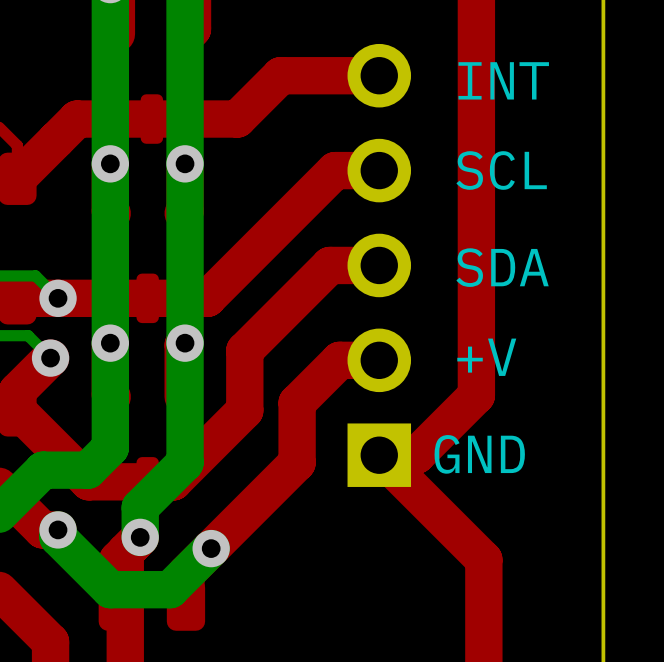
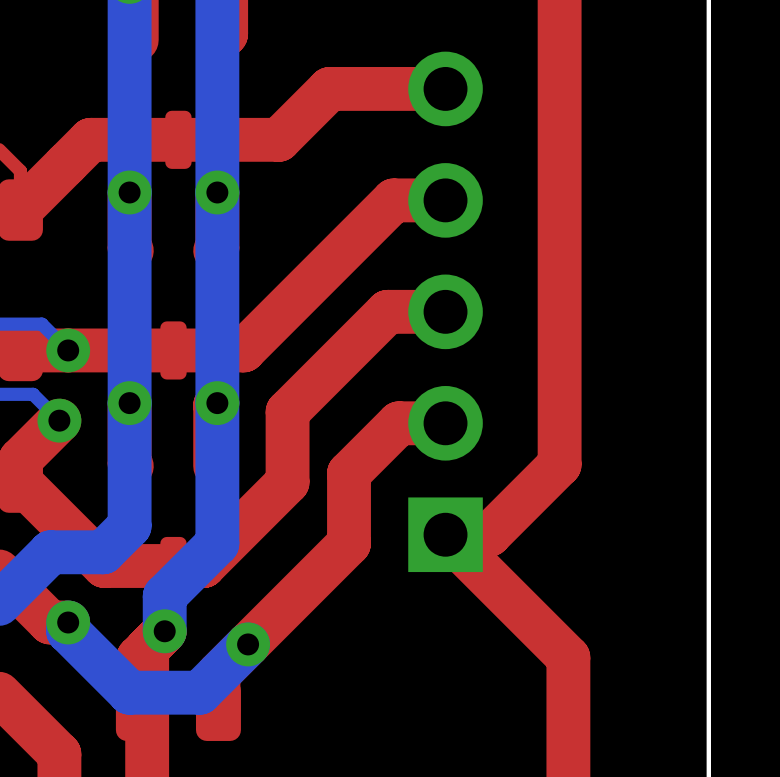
text: INT (503, 80) -> none
text: SCL (501, 170) -> none
text: SDA (502, 267) -> none
text: +V (486, 357) -> none
text: GND (479, 454) -> none

